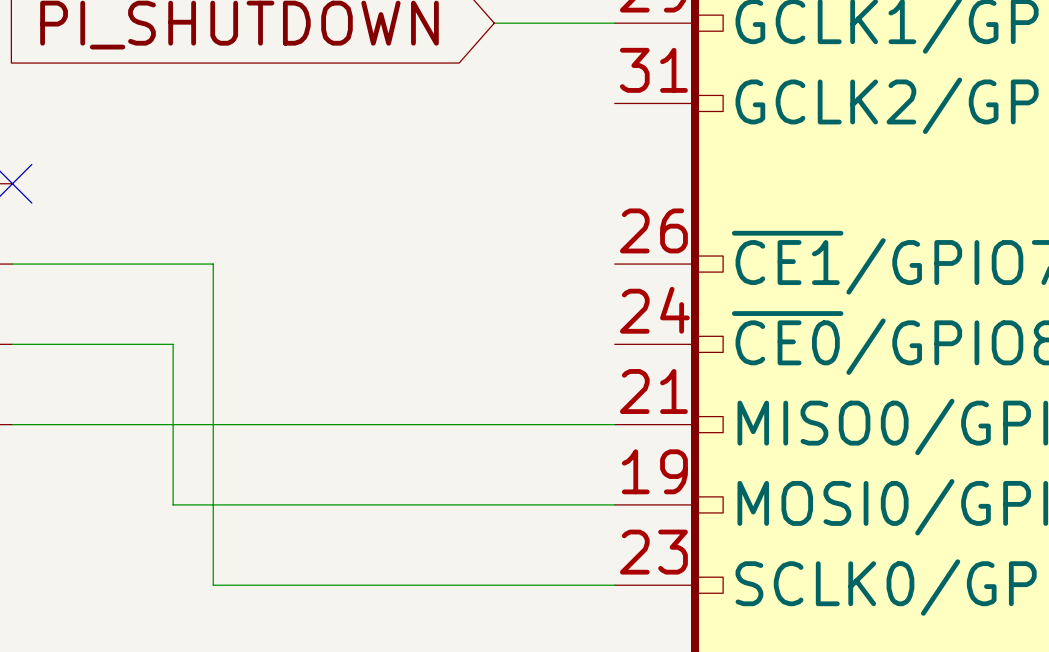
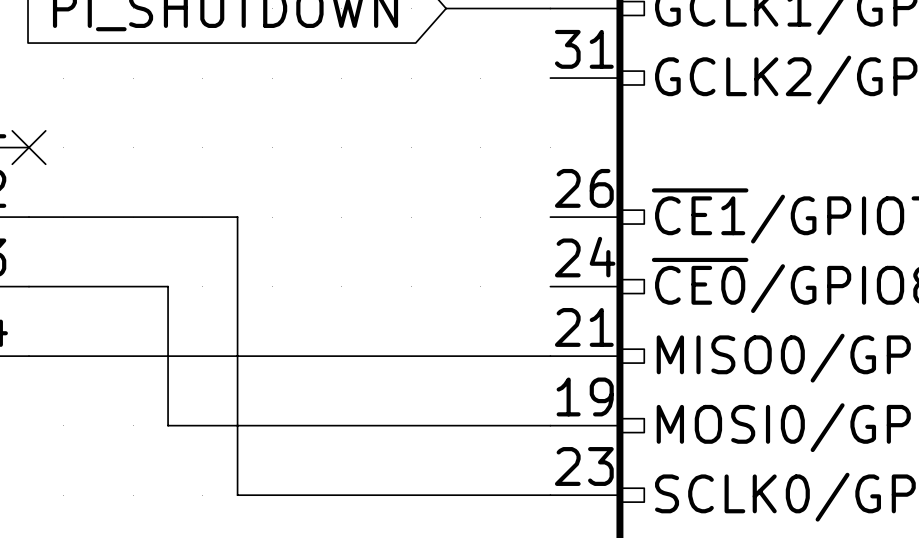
wire: (213, 264) (213, 585) (253, 585) -> (202, 217) (237, 217) (237, 495)

